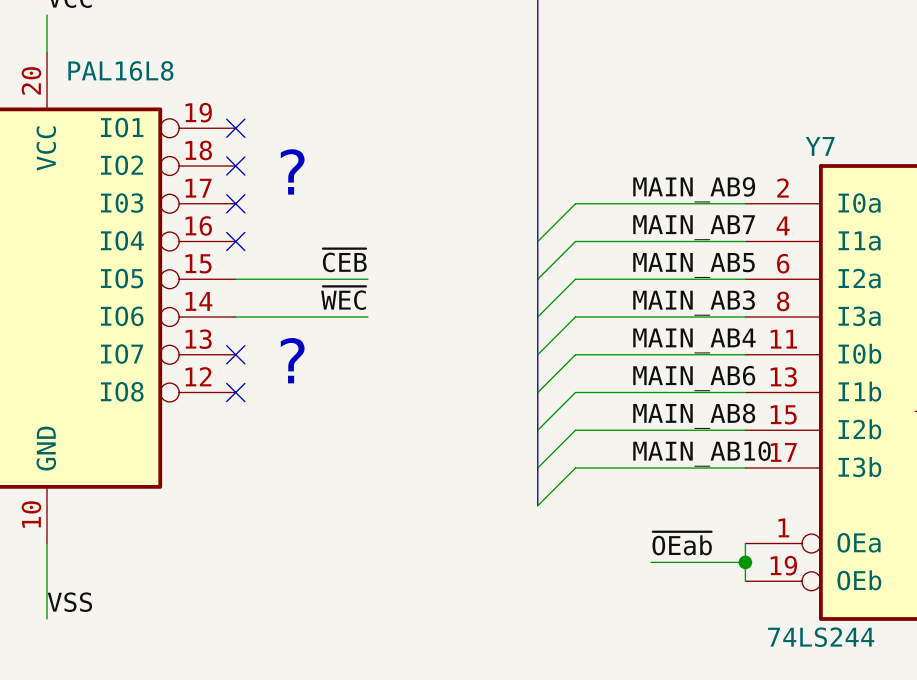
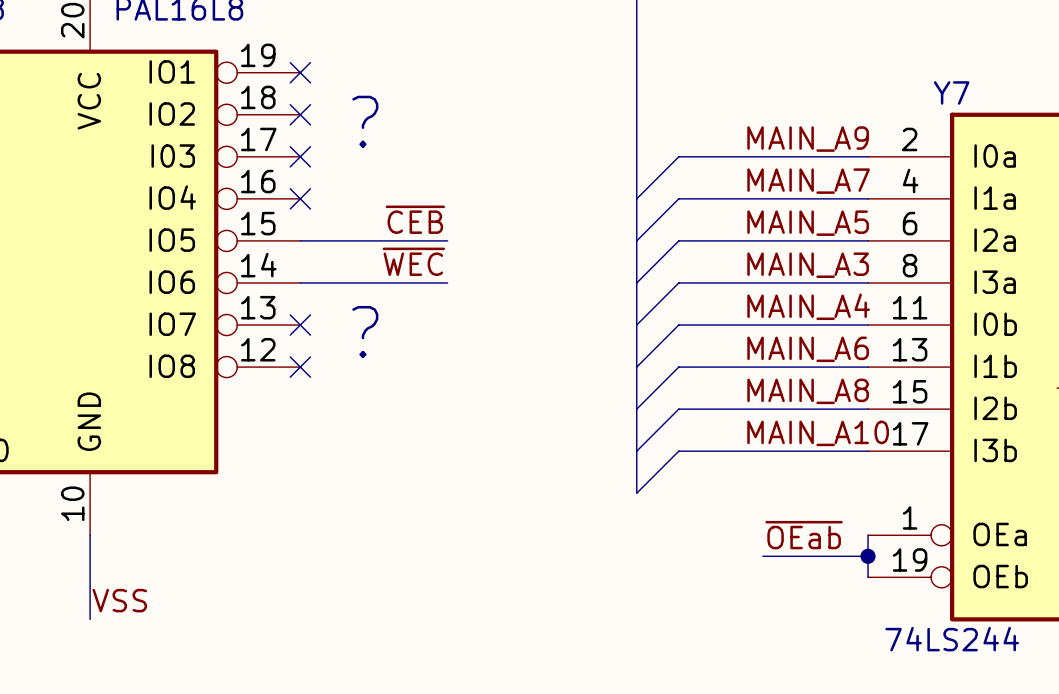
label: MAIN_AB9 (694, 189) -> MAIN_A9 (808, 139)
label: MAIN_AB7 (694, 227) -> MAIN_A7 (808, 181)
label: MAIN_AB5 (694, 265) -> MAIN_A5 (808, 223)
label: MAIN_AB3 (694, 303) -> MAIN_A3 (808, 265)
label: MAIN_AB4 (694, 340) -> MAIN_A4 (808, 306)
label: MAIN_AB6 (694, 378) -> MAIN_A6 (808, 349)
label: MAIN_AB8 (694, 416) -> MAIN_A8 (808, 391)
label: MAIN_AB10 (701, 454) -> MAIN_A10 (818, 433)

